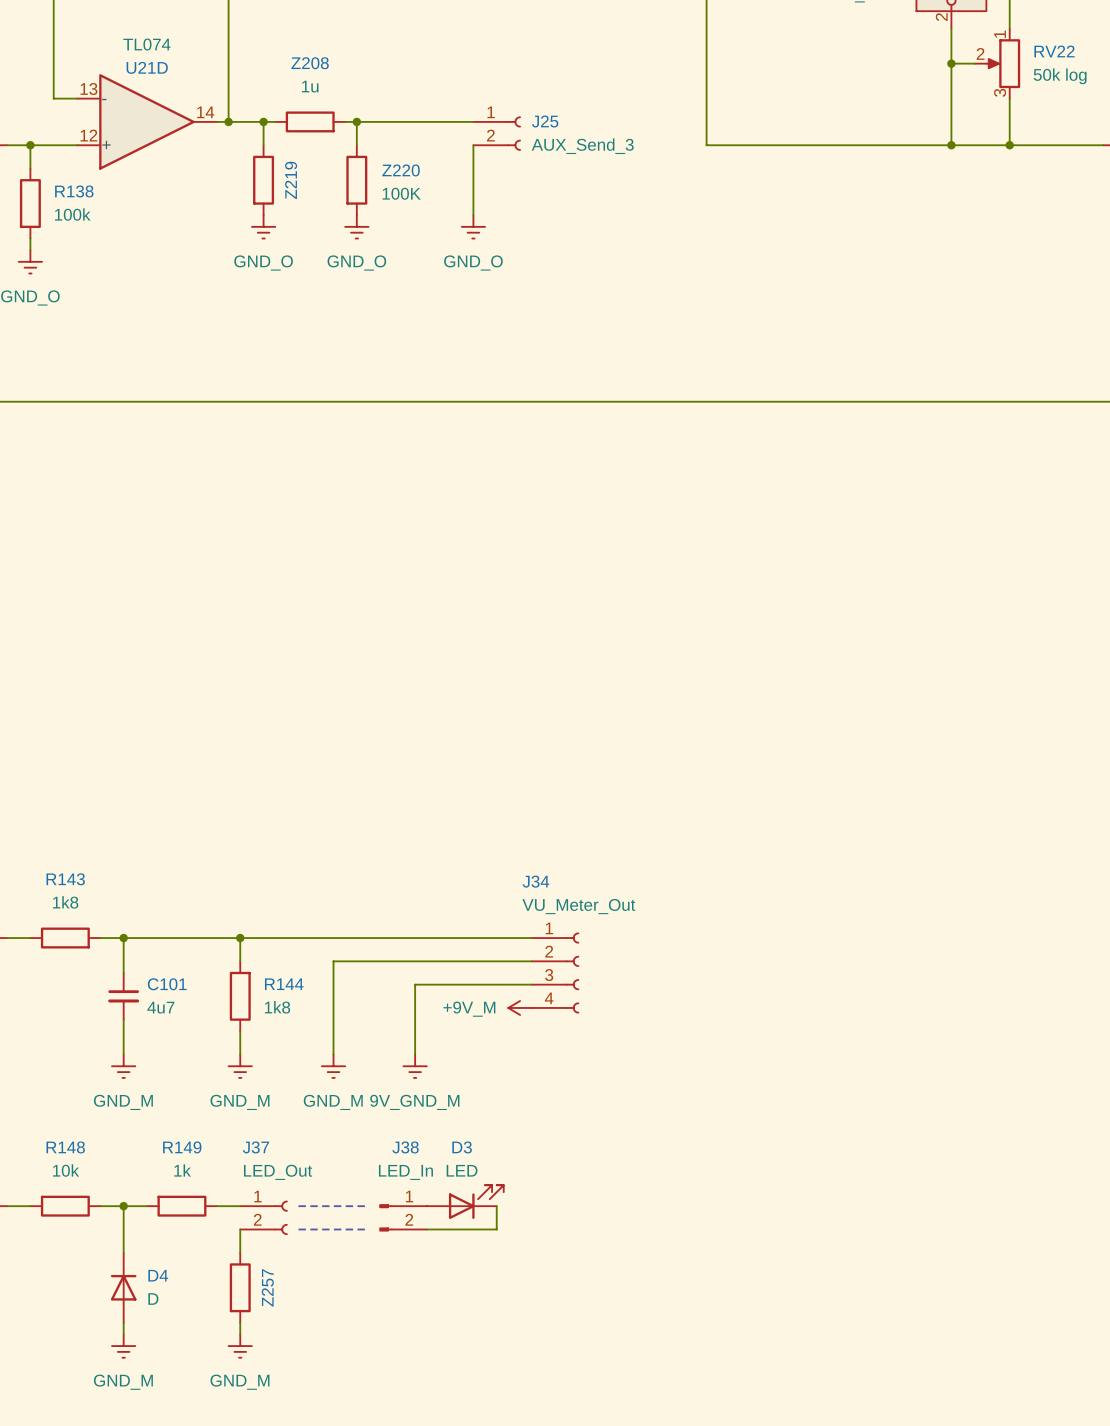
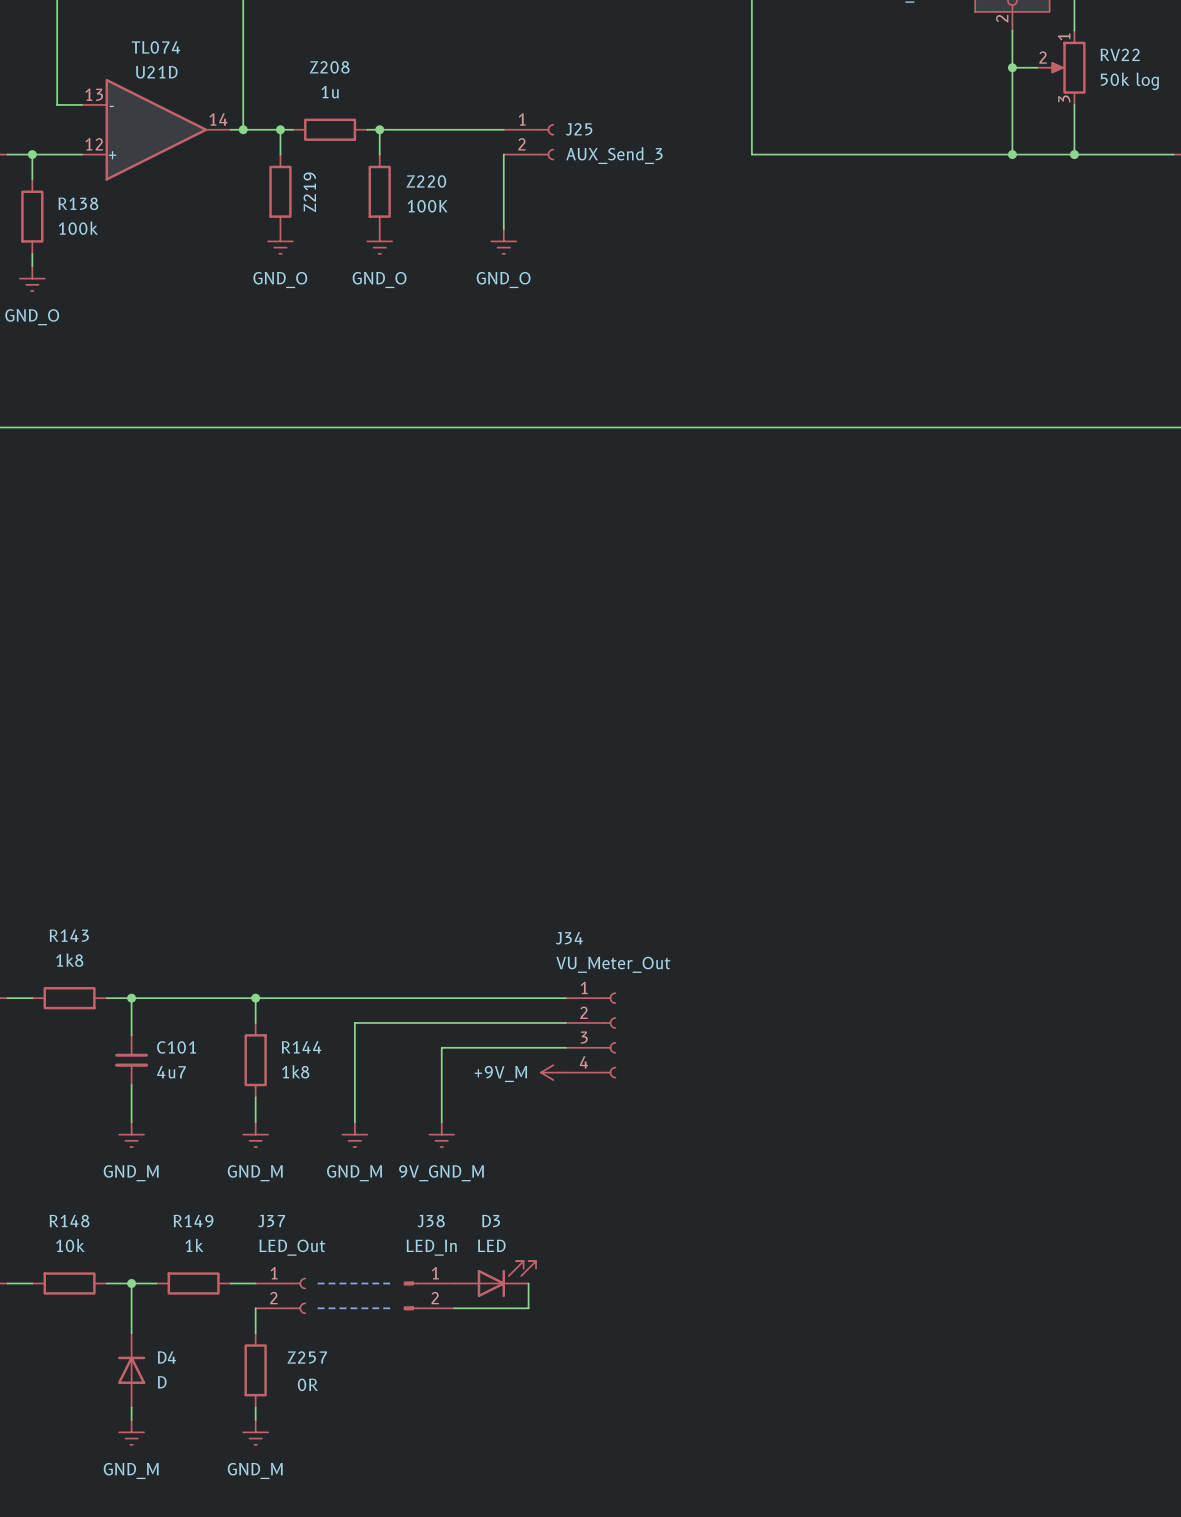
Z257 name rotation: 0° (267, 1287) -> 90° clockwise (307, 1357)
Z257 value: none -> 0R (307, 1384)

